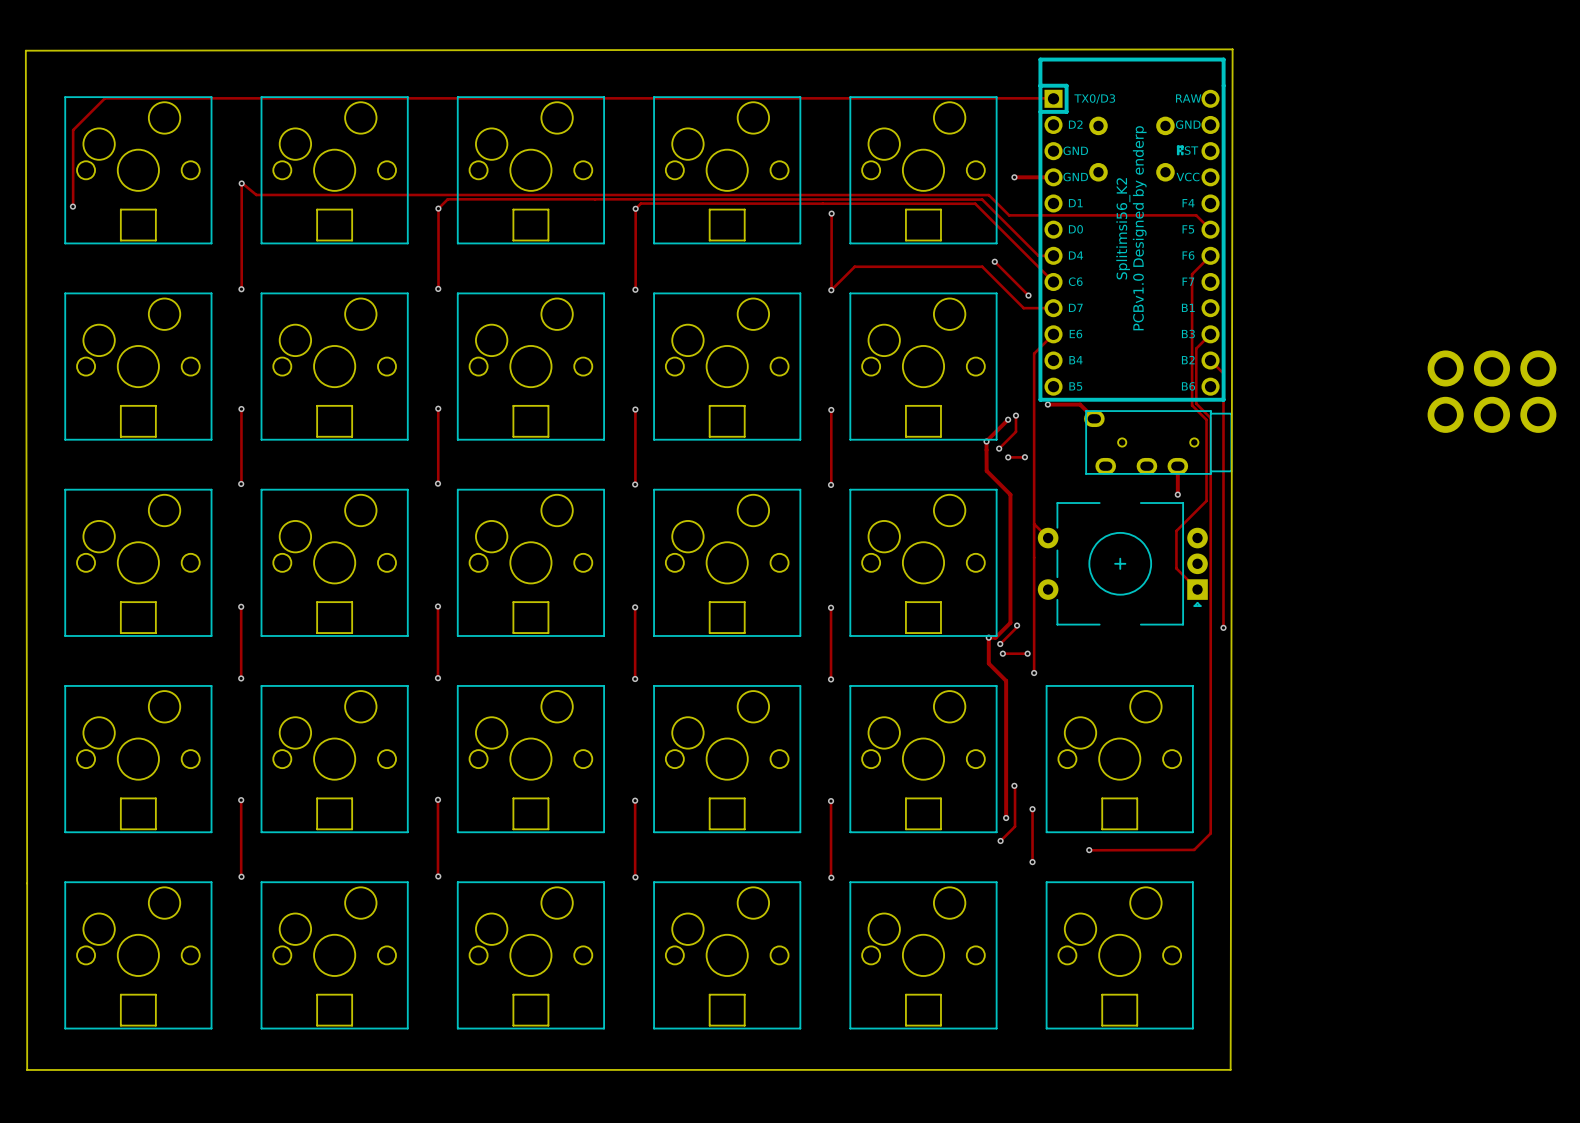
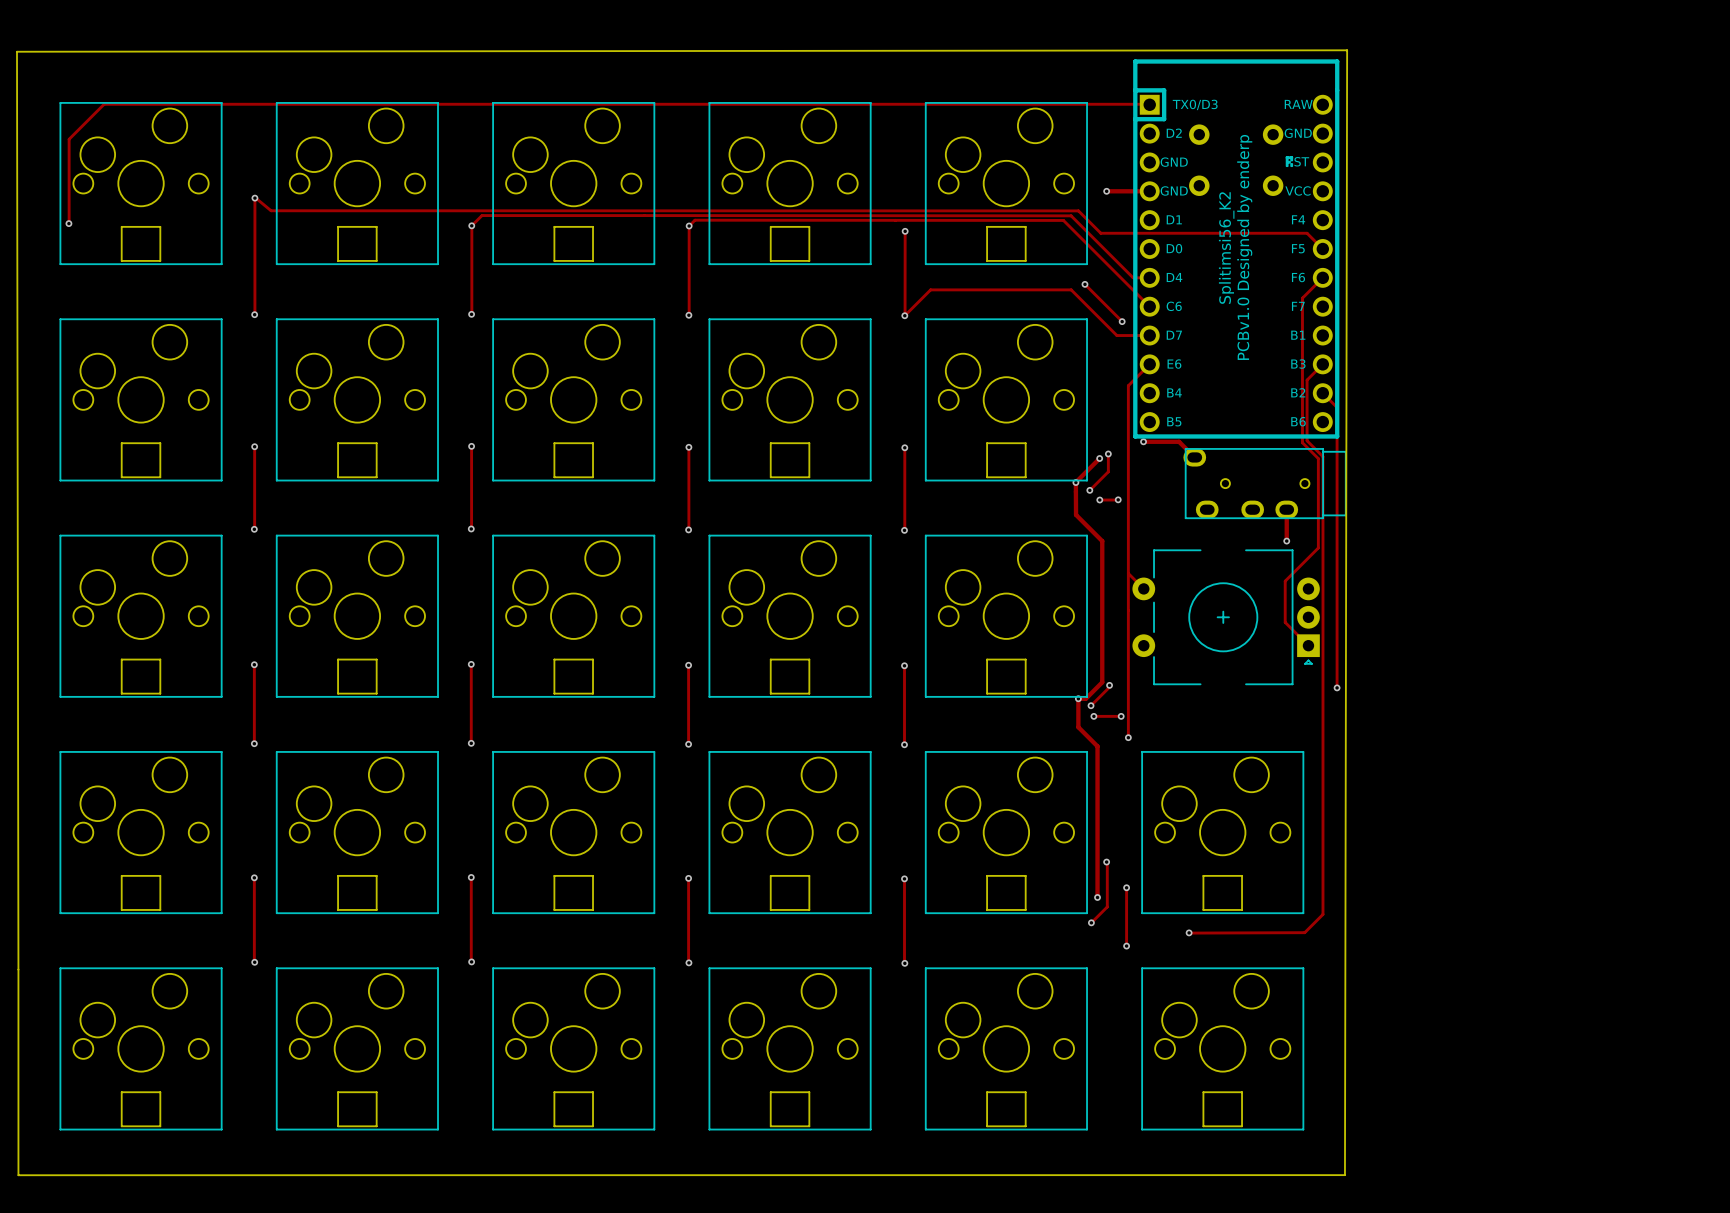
part: (1445, 368) -> none
part: (1491, 368) -> none
part: (1538, 368) -> none
part: (1445, 414) -> none
part: (1491, 414) -> none
part: (1538, 414) -> none

